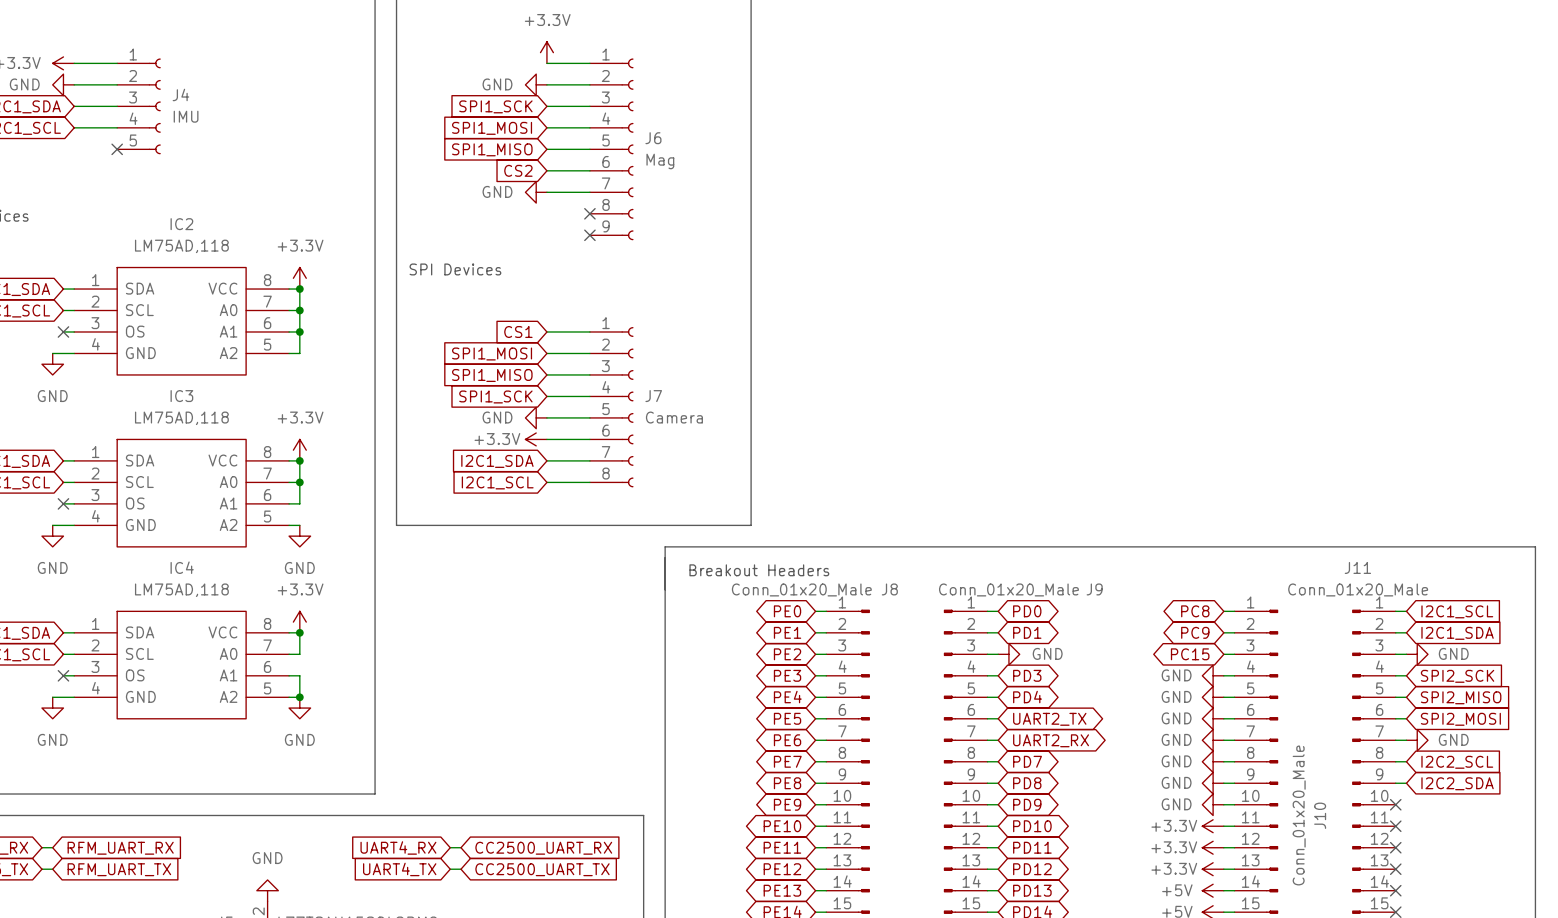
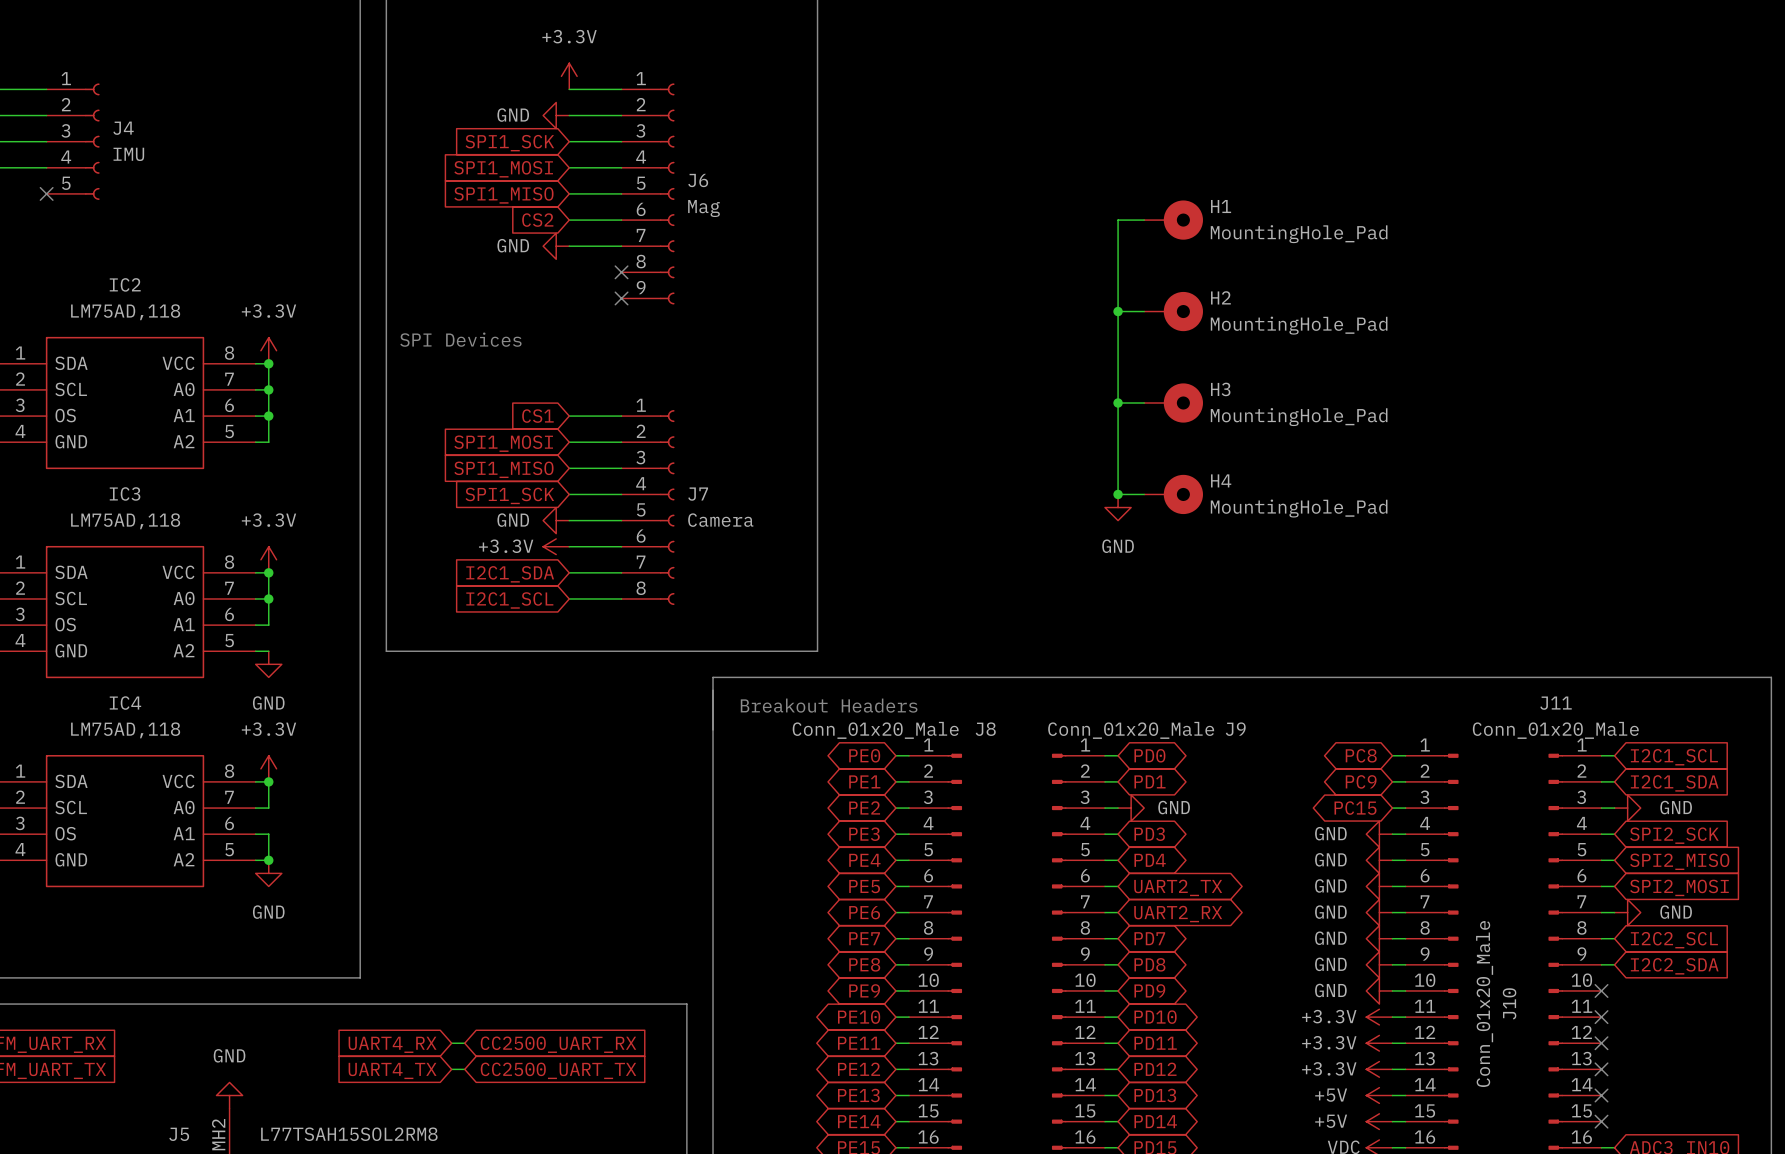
wire: none -> (1144, 220) (1118, 220) (1118, 494) (1144, 494)
H1: none -> MountingHole_Pad (1173, 220)
wire: none -> (1118, 311) (1144, 311)
junction: none -> (1118, 311)
H2: none -> MountingHole_Pad (1173, 311)
wire: none -> (1118, 403) (1144, 403)
junction: none -> (1118, 403)
H3: none -> MountingHole_Pad (1173, 403)
junction: none -> (1118, 494)
H4: none -> MountingHole_Pad (1173, 494)
power symbol: none -> GND (1118, 507)

